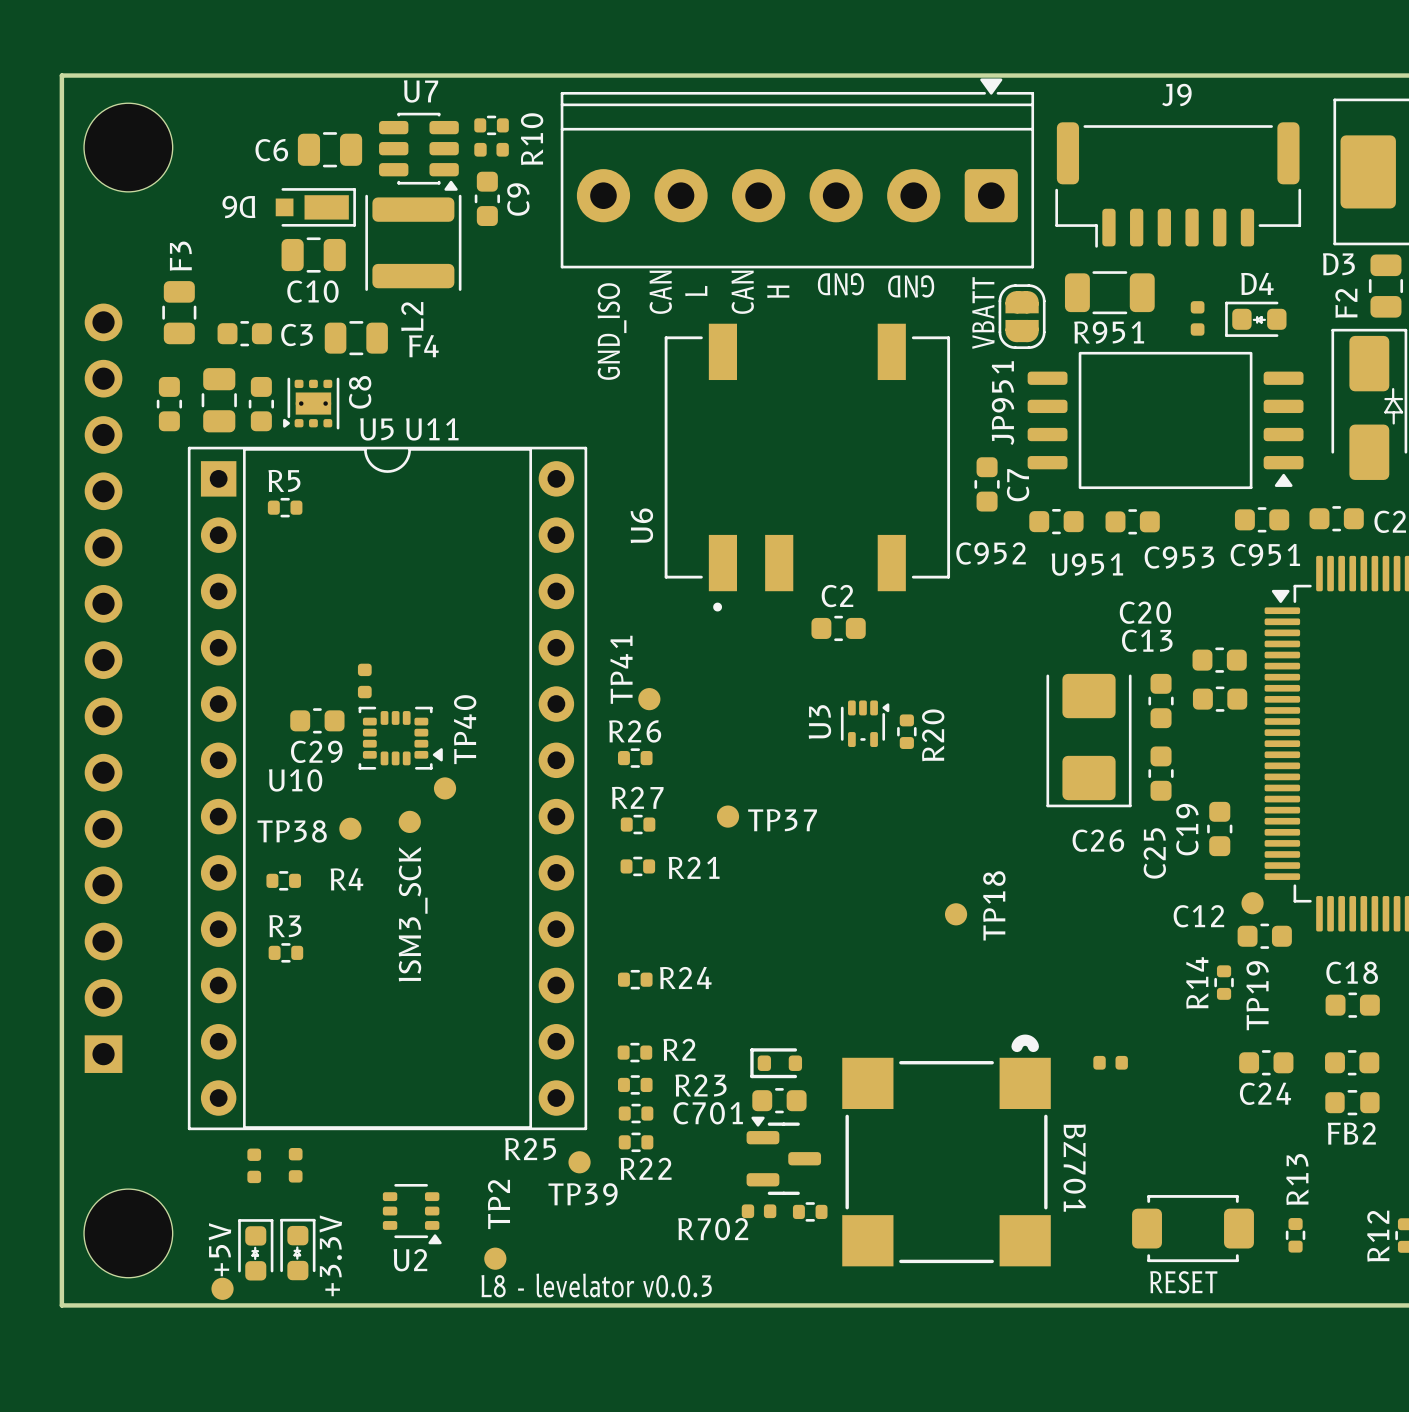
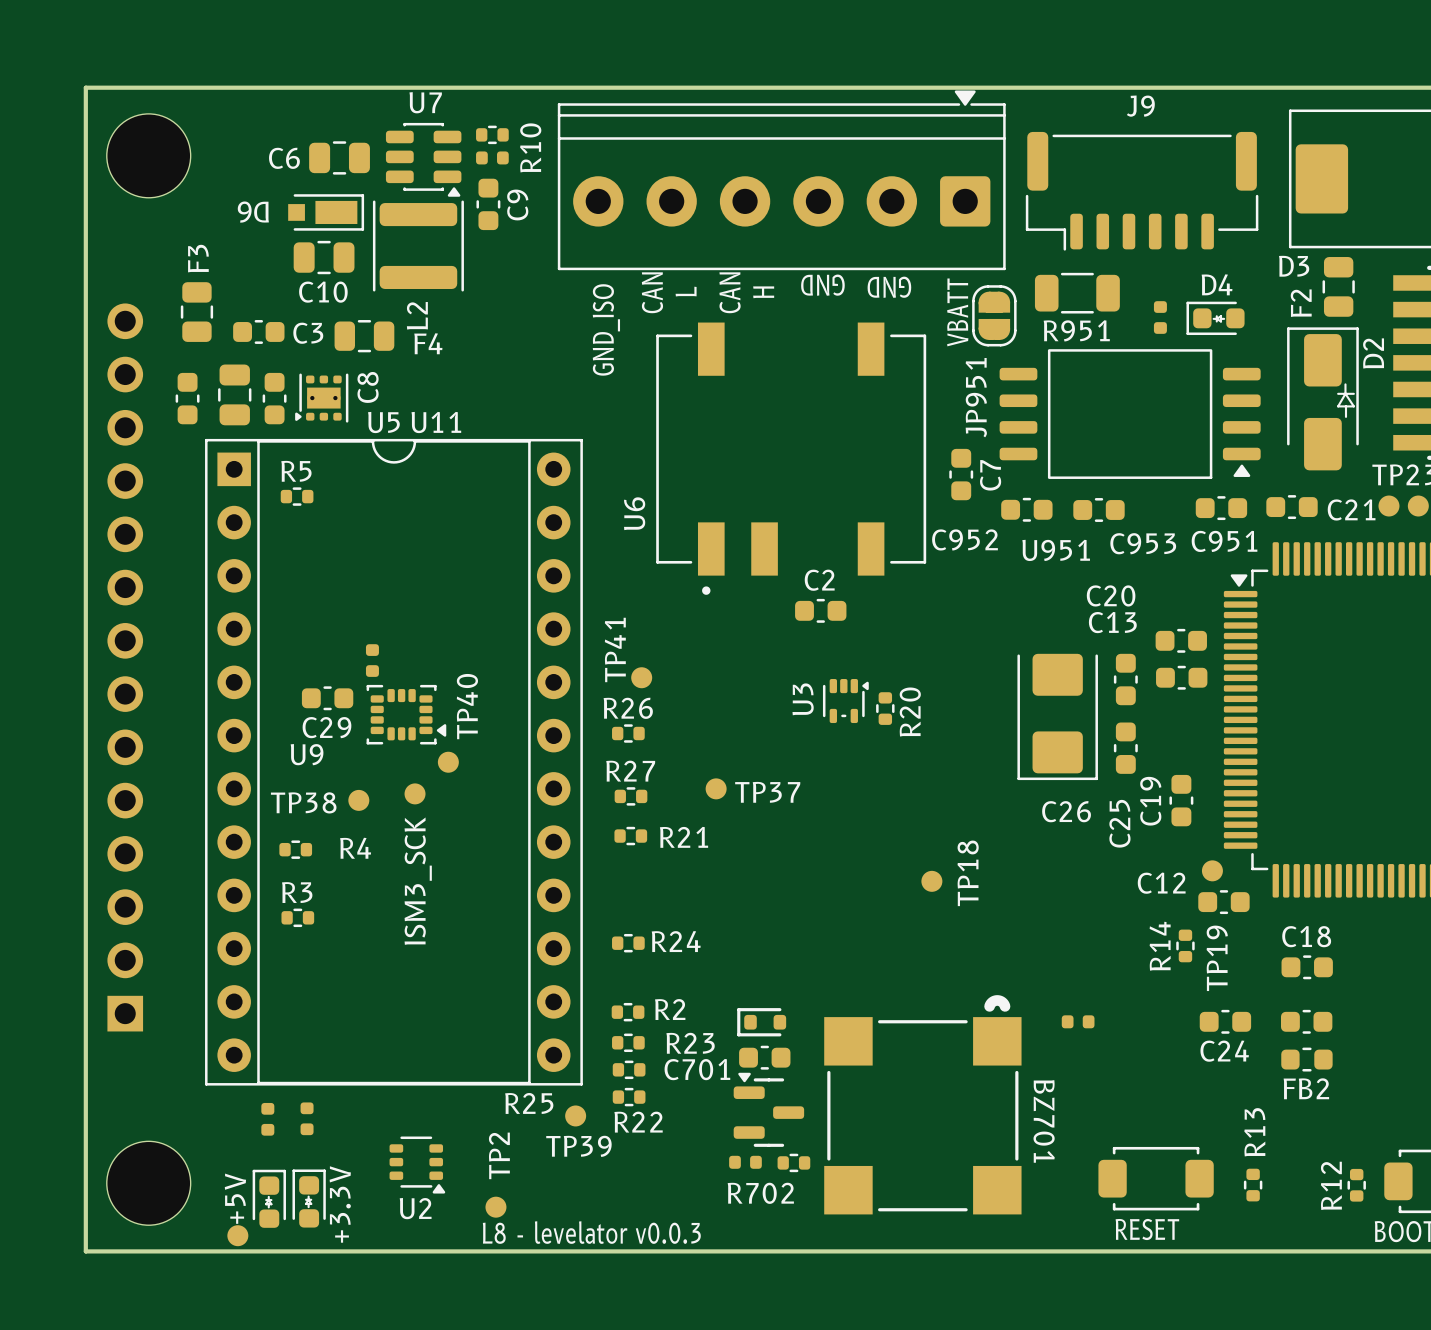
U10 name: U10 (295, 780) -> U9 (307, 754)
R702 name position: R702 (713, 1229) -> R702 (760, 1193)

